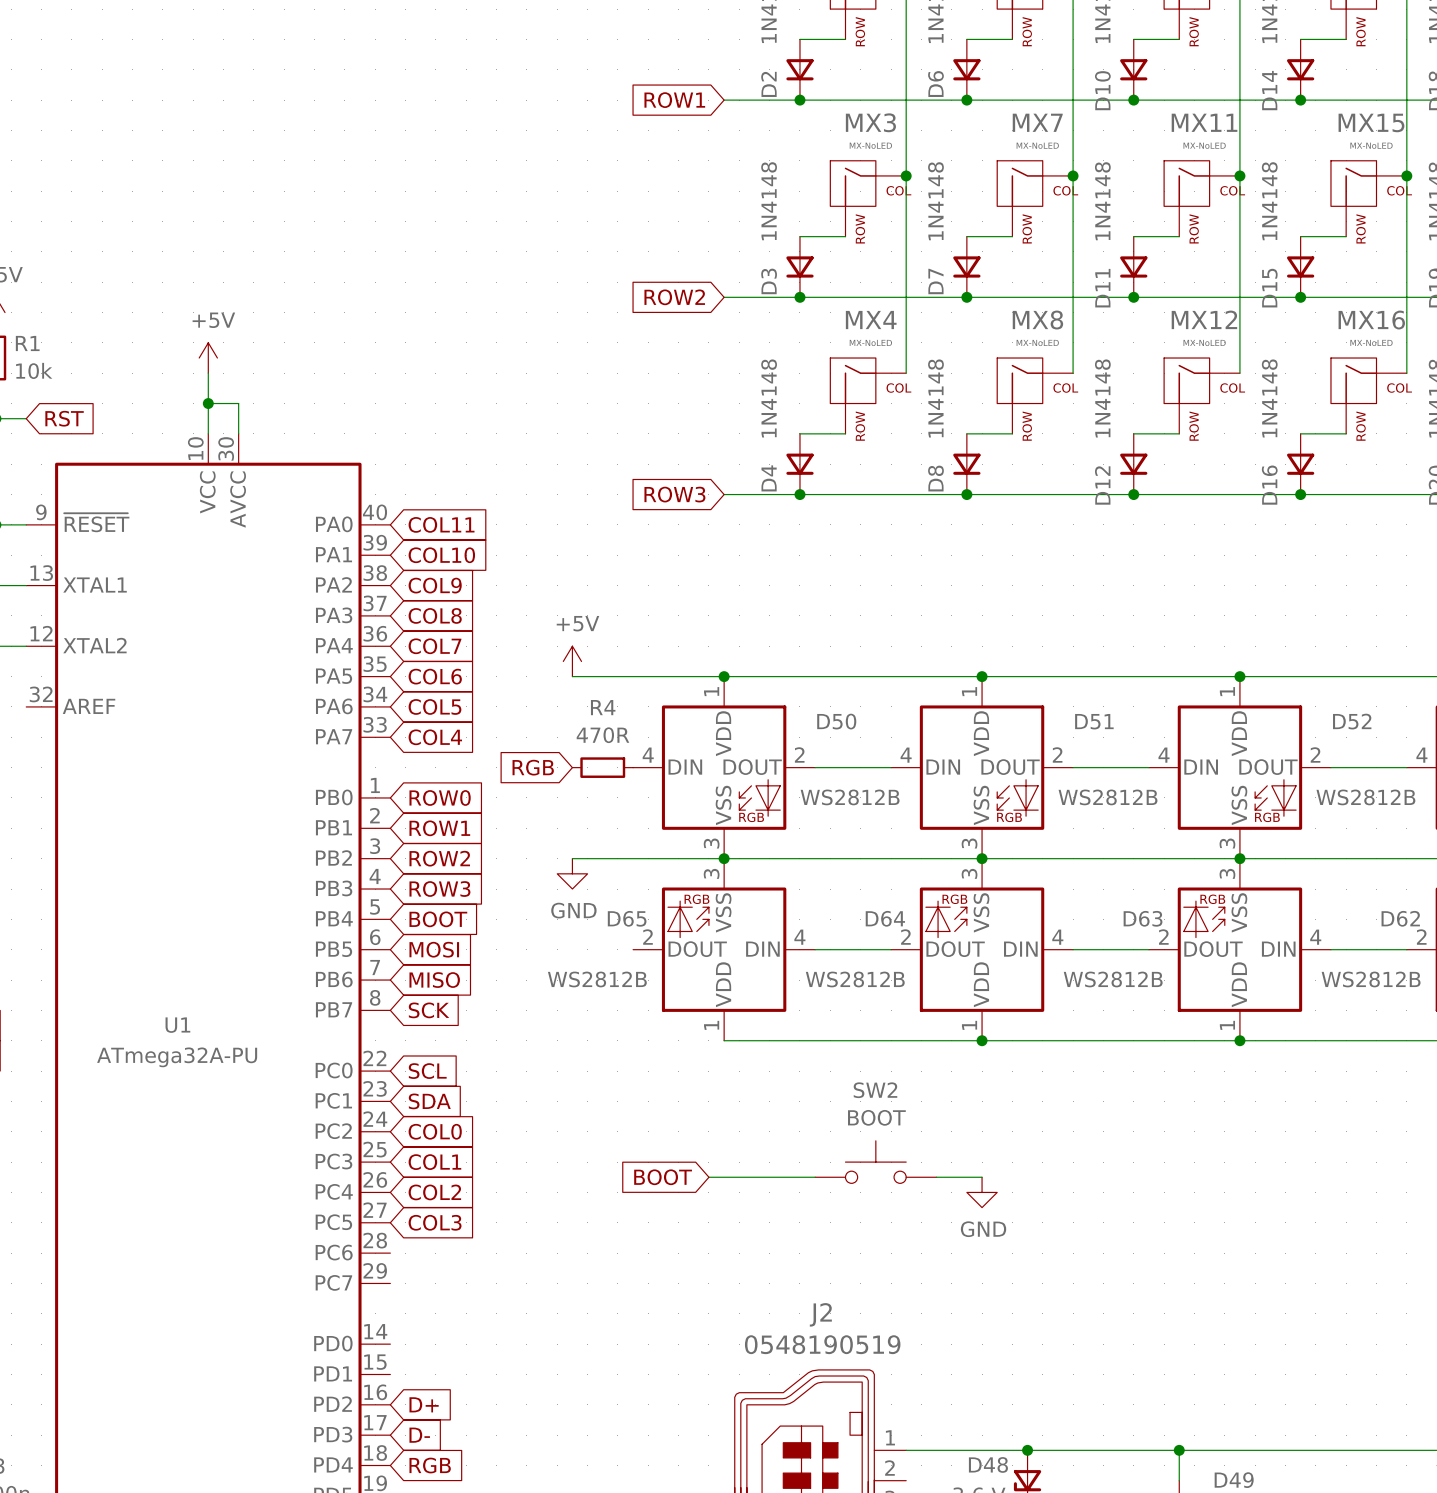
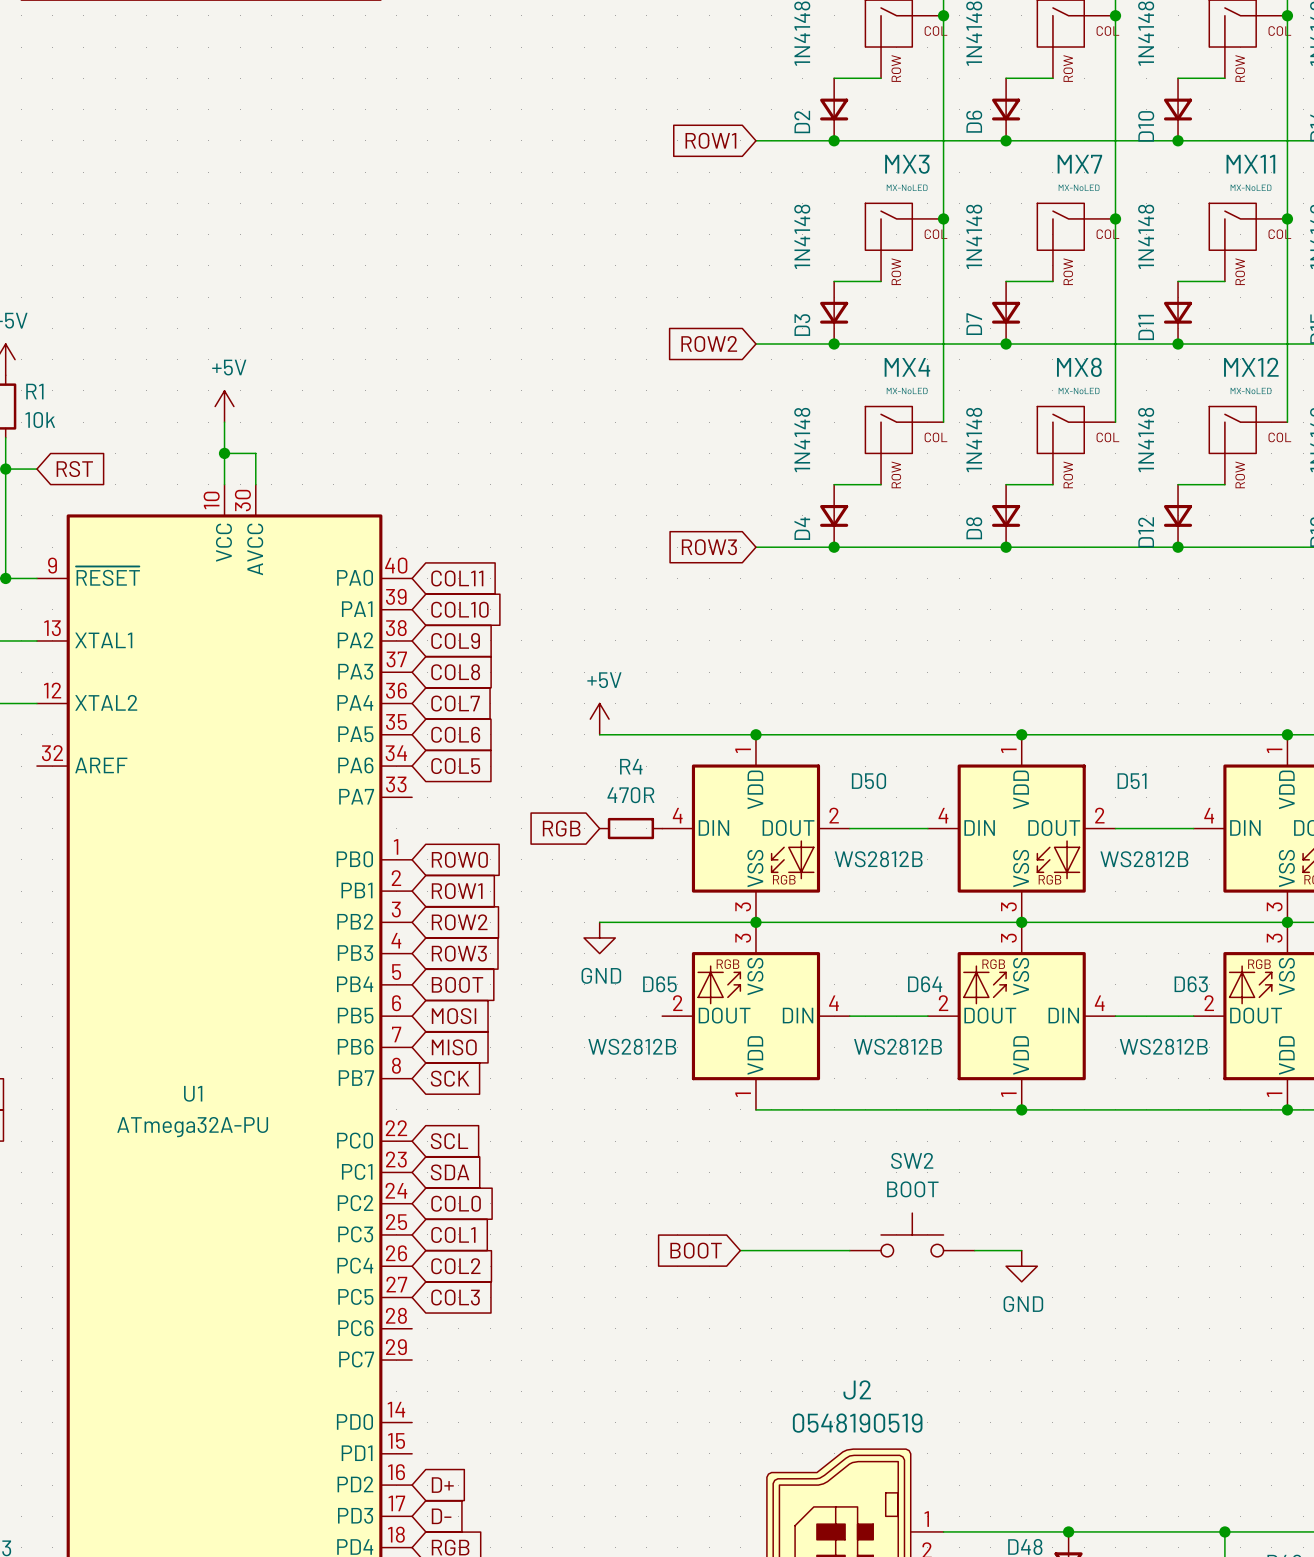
global label: COL4 (435, 737) -> none

